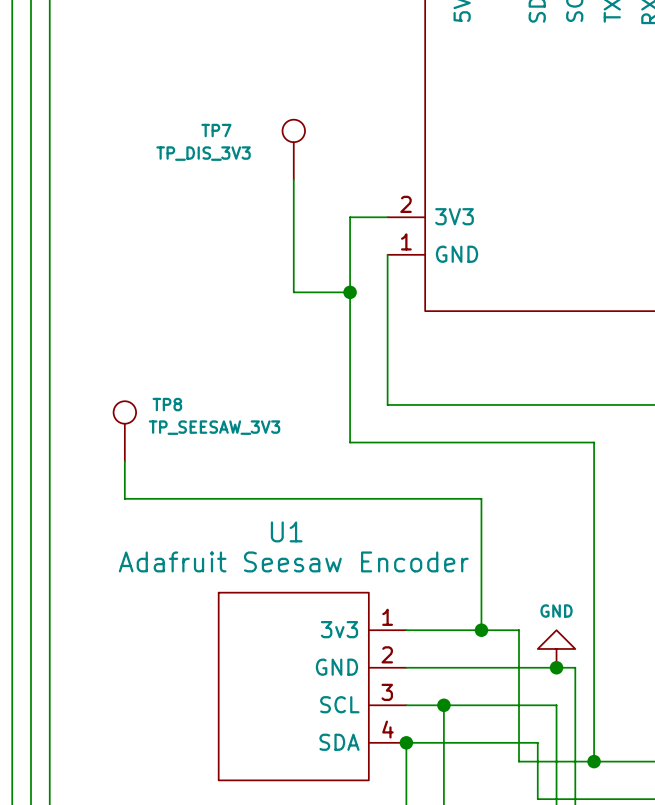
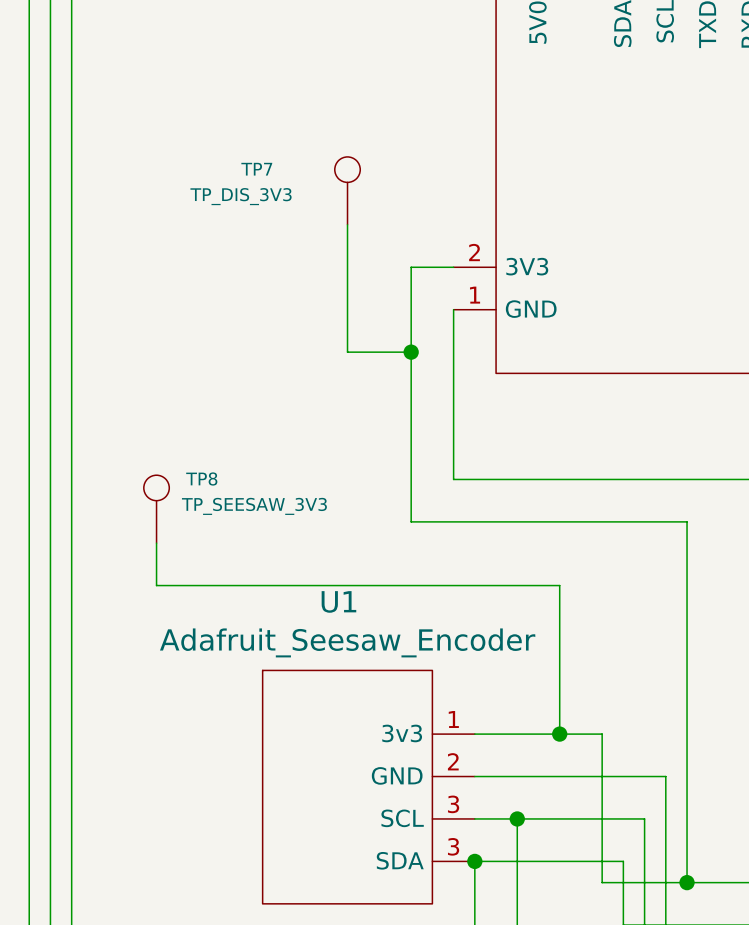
U1 value: Adafruit Seesaw Encoder (293, 561) -> Adafruit_Seesaw_Encoder (347, 642)
U1 symbol: [218, 592, 407, 781] -> [262, 670, 475, 904]
power symbol: GND (556, 648) -> none
junction: (556, 667) -> none

